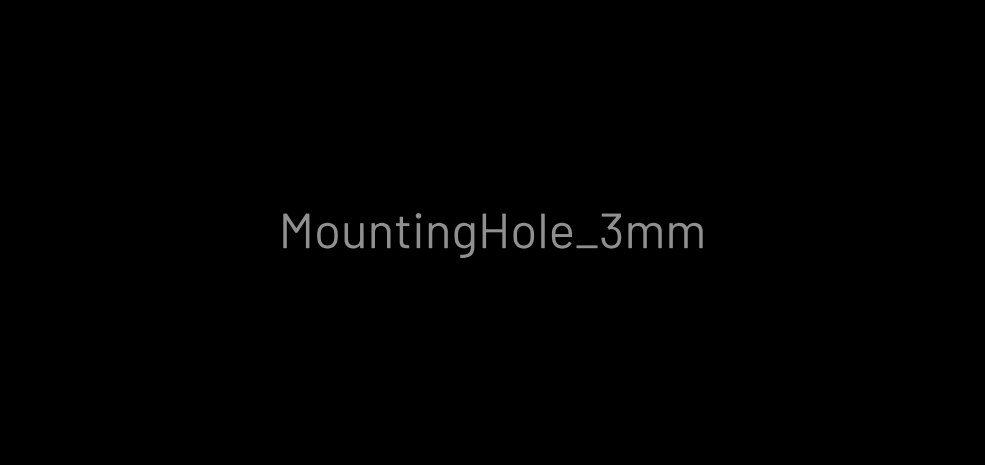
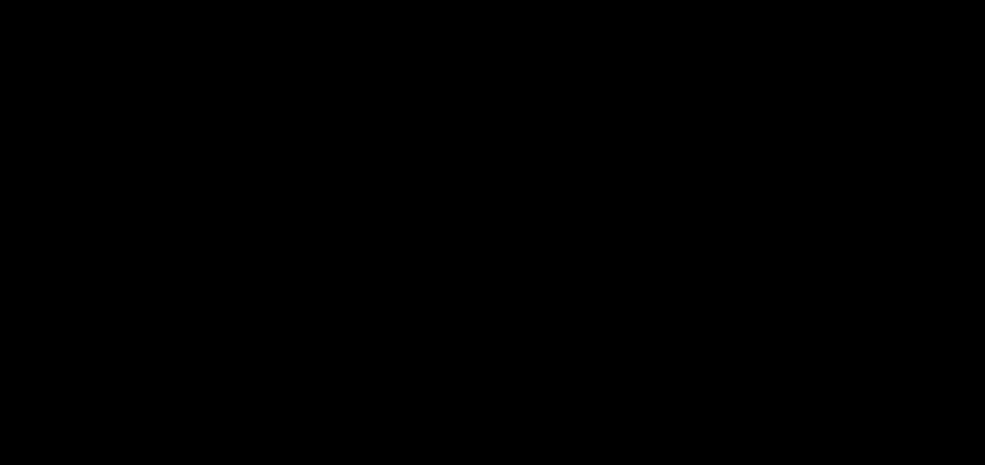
drawing: [283, 213, 703, 259] -> none

